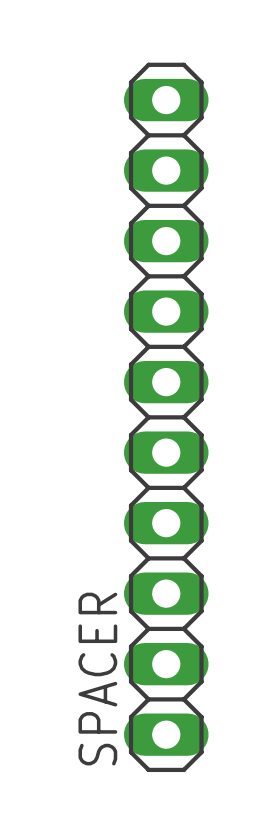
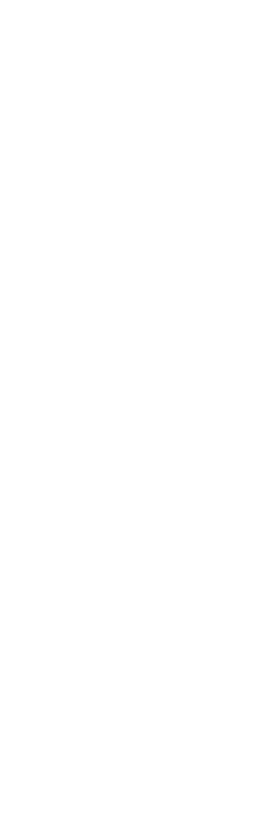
SPACER: (166, 417) -> none

